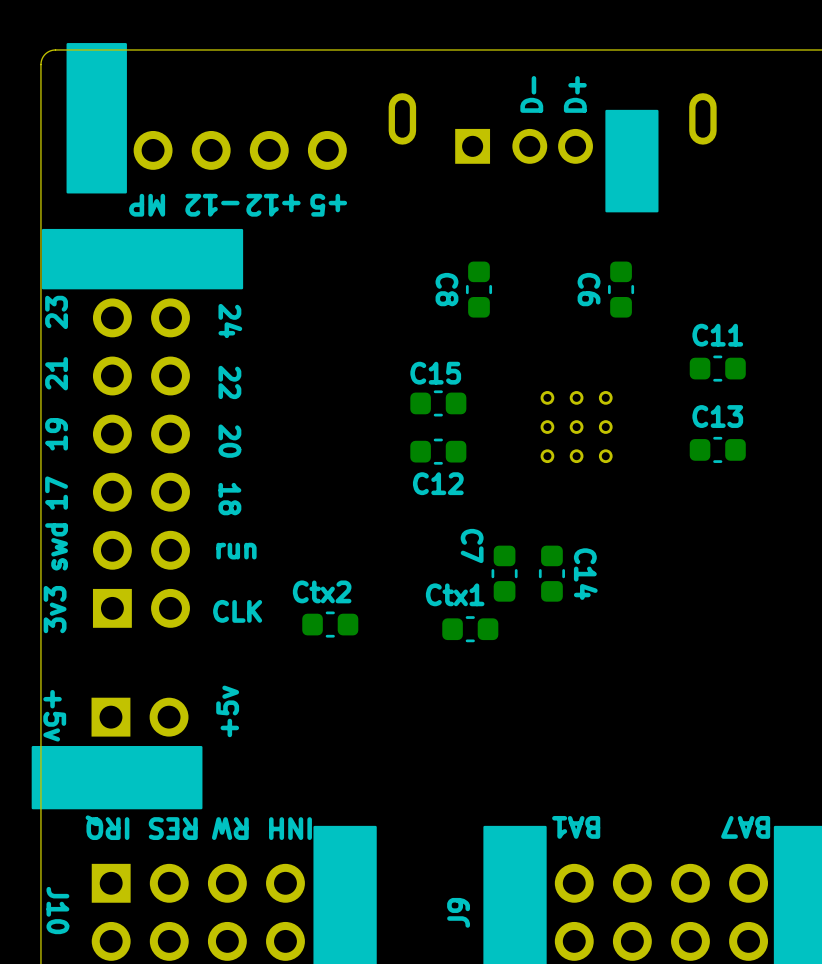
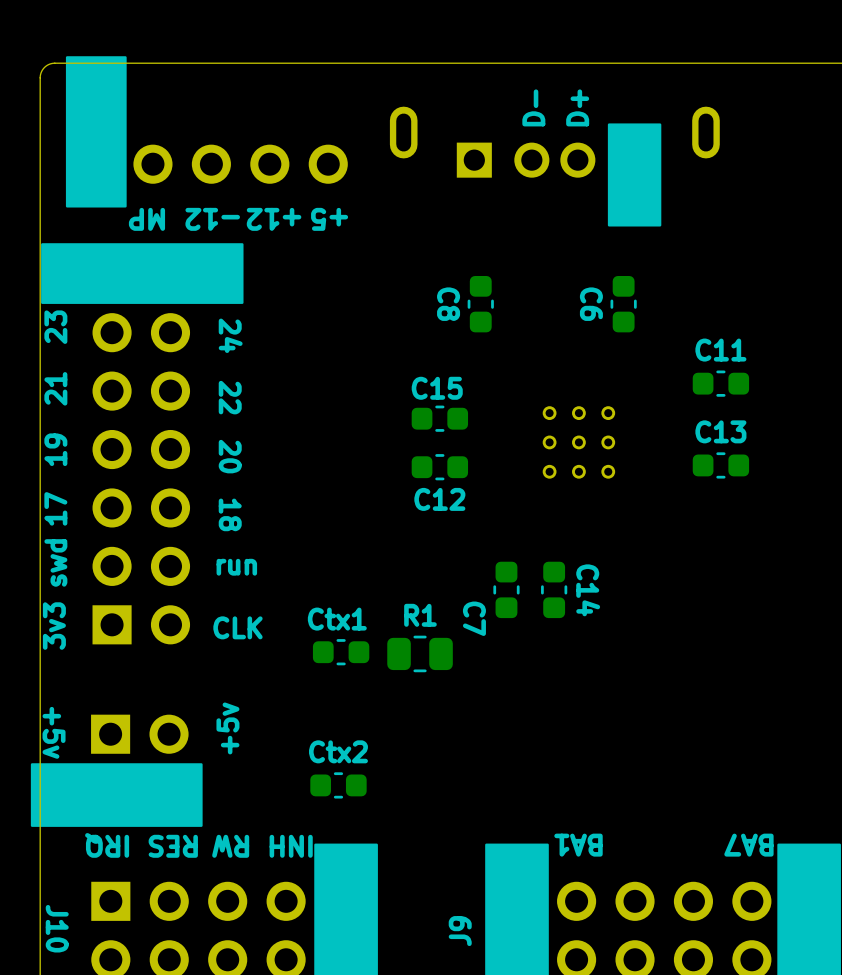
C7 name position: C7 (472, 545) -> C7 (474, 618)
Ctx2 name position: Ctx2 (322, 591) -> Ctx2 (338, 751)
Ctx1 name position: Ctx1 (455, 594) -> Ctx1 (337, 619)
Ctx2 position: (330, 624) -> (338, 785)
Ctx1 position: (470, 629) -> (341, 652)
R1: none -> (420, 653)

